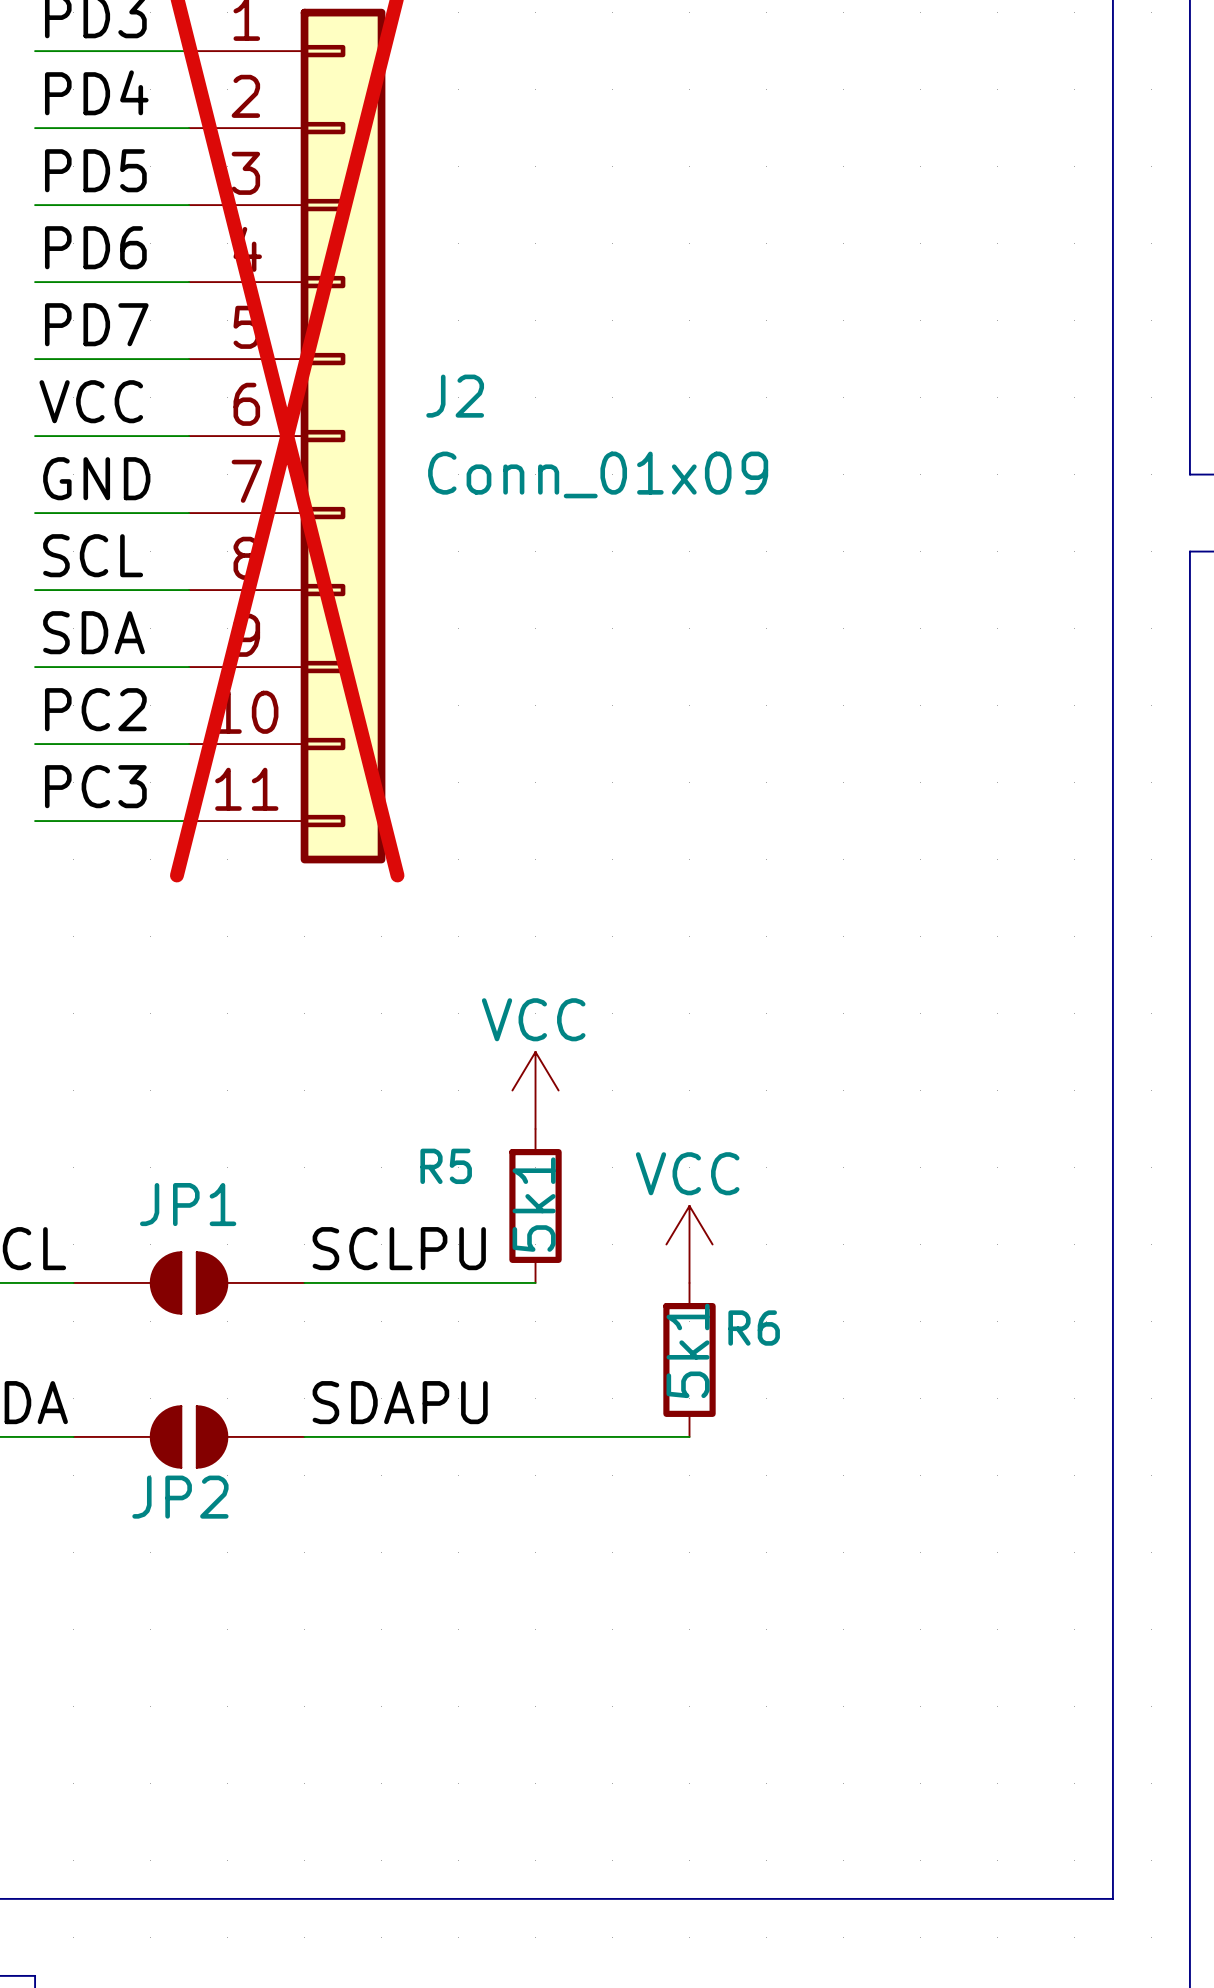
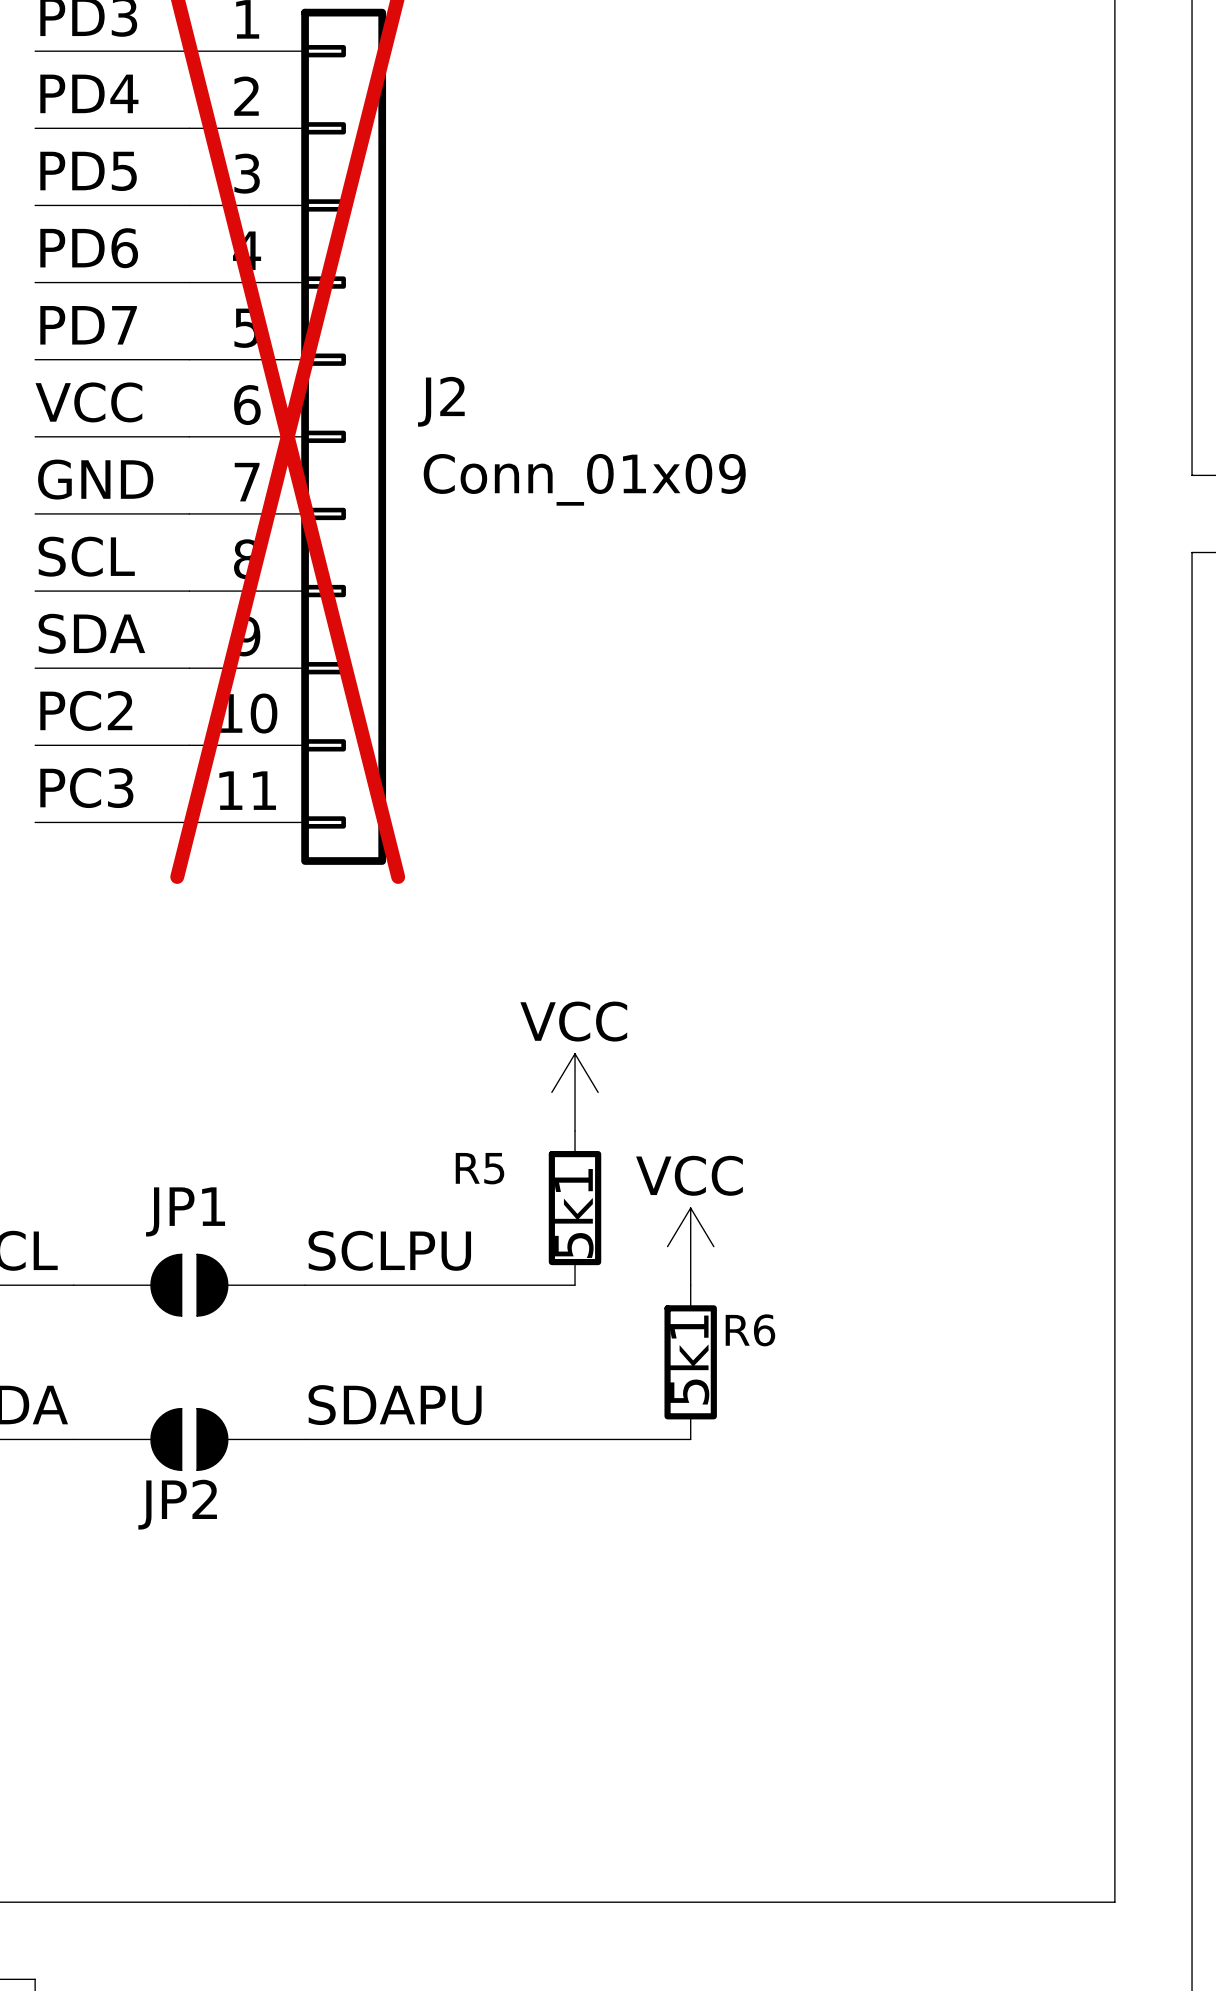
power symbol position: VCC (535, 1090) -> VCC (575, 1092)
R5 position: (535, 1205) -> (575, 1208)
wire: none -> (536, 1285) (575, 1285)

